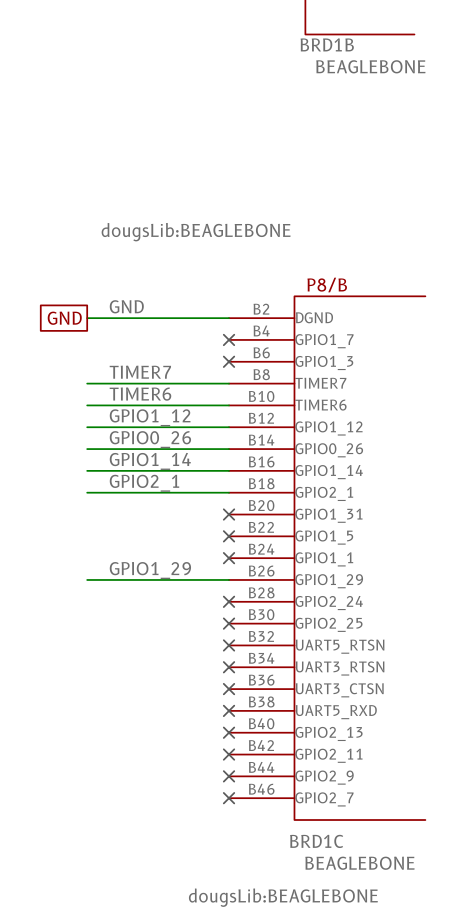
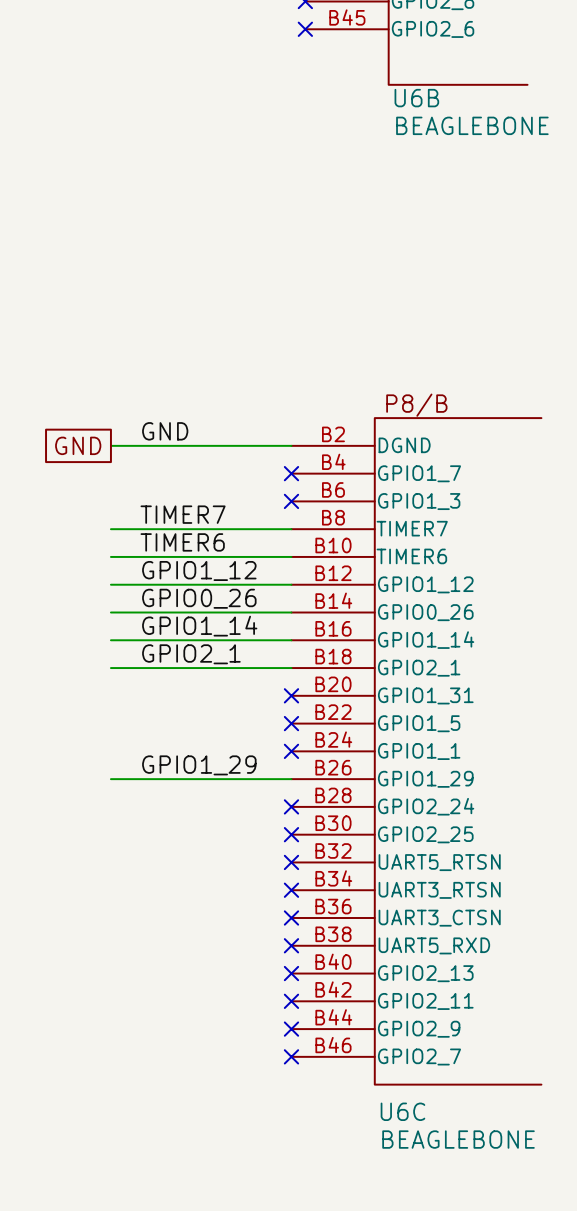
BRD1B name: BRD1B (327, 44) -> U6B (416, 98)
BRD1B text: dougsLib:BEAGLEBONE (196, 232) -> none
BRD1C name: BRD1C (316, 841) -> U6C (402, 1111)
BRD1C text: dougsLib:BEAGLEBONE (283, 897) -> none

